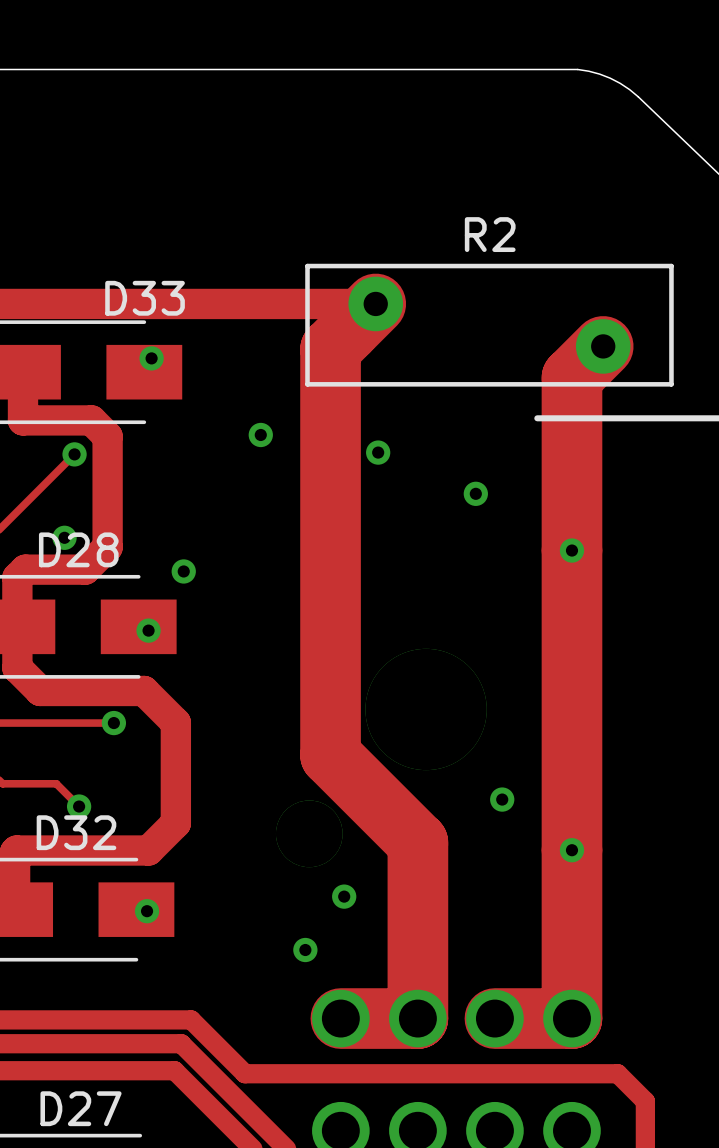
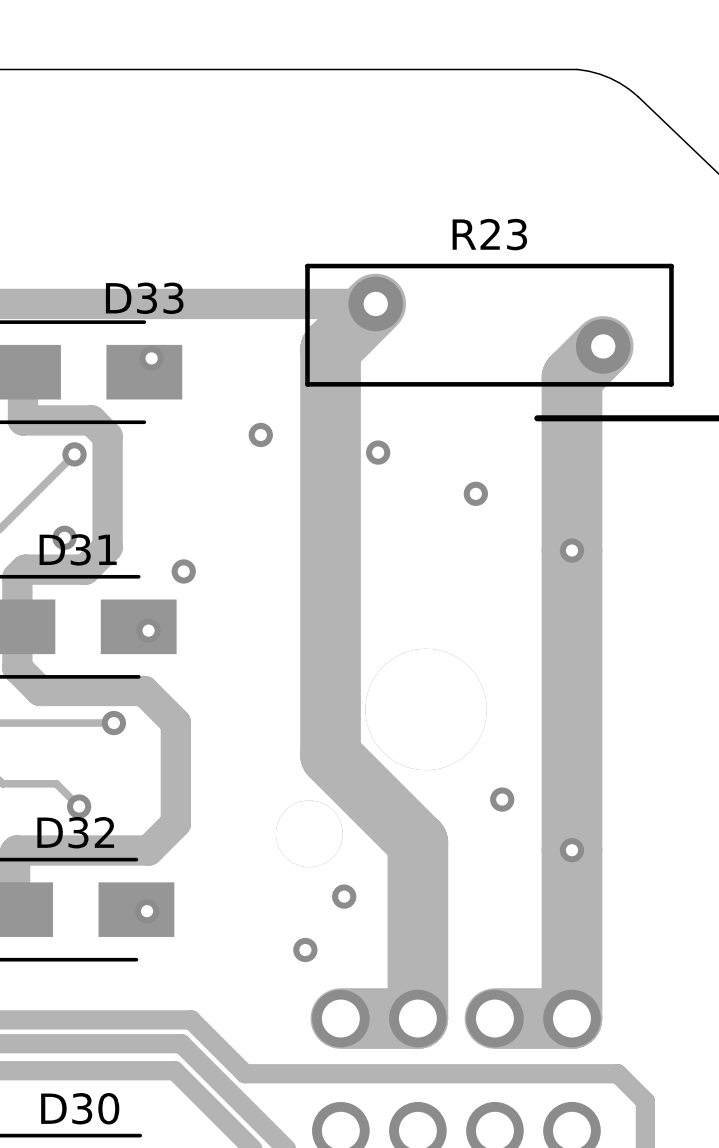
R2 name: R2 (490, 234) -> R23 (489, 234)
D28 name: D28 (78, 549) -> D31 (78, 549)
D27 name: D27 (81, 1108) -> D30 (80, 1108)

